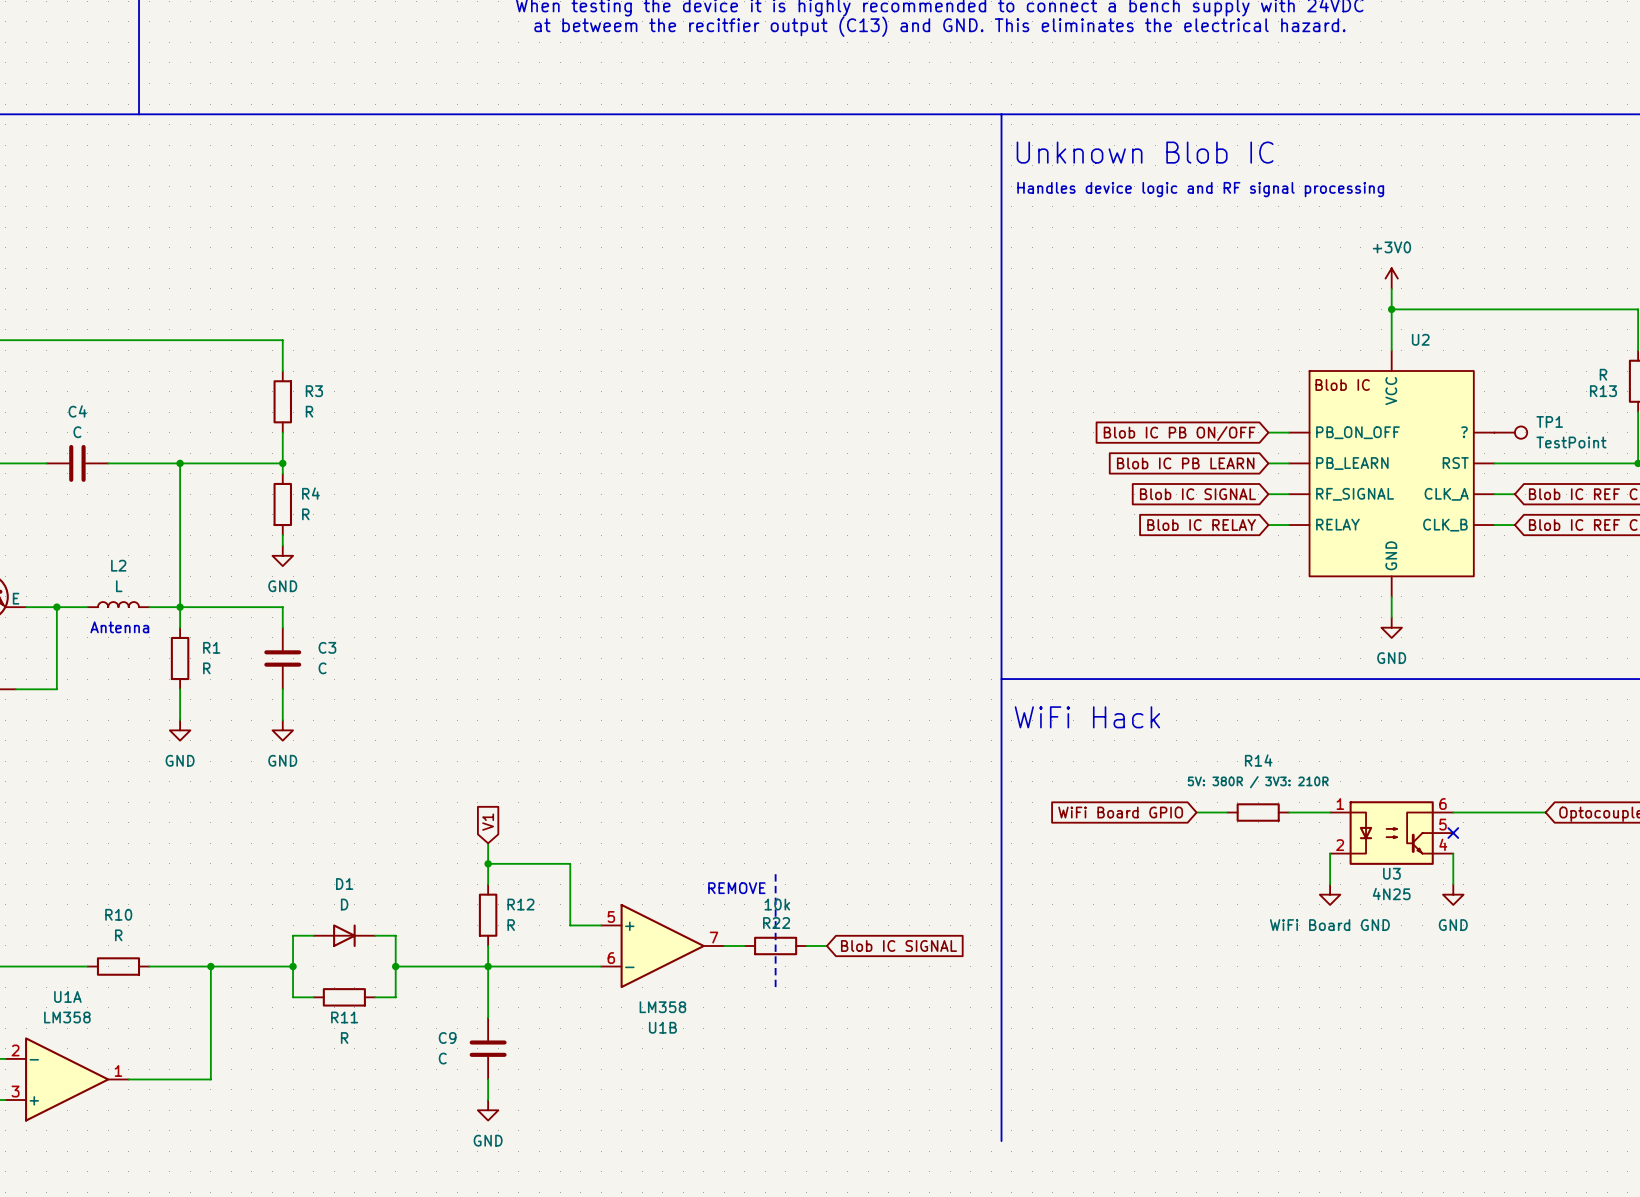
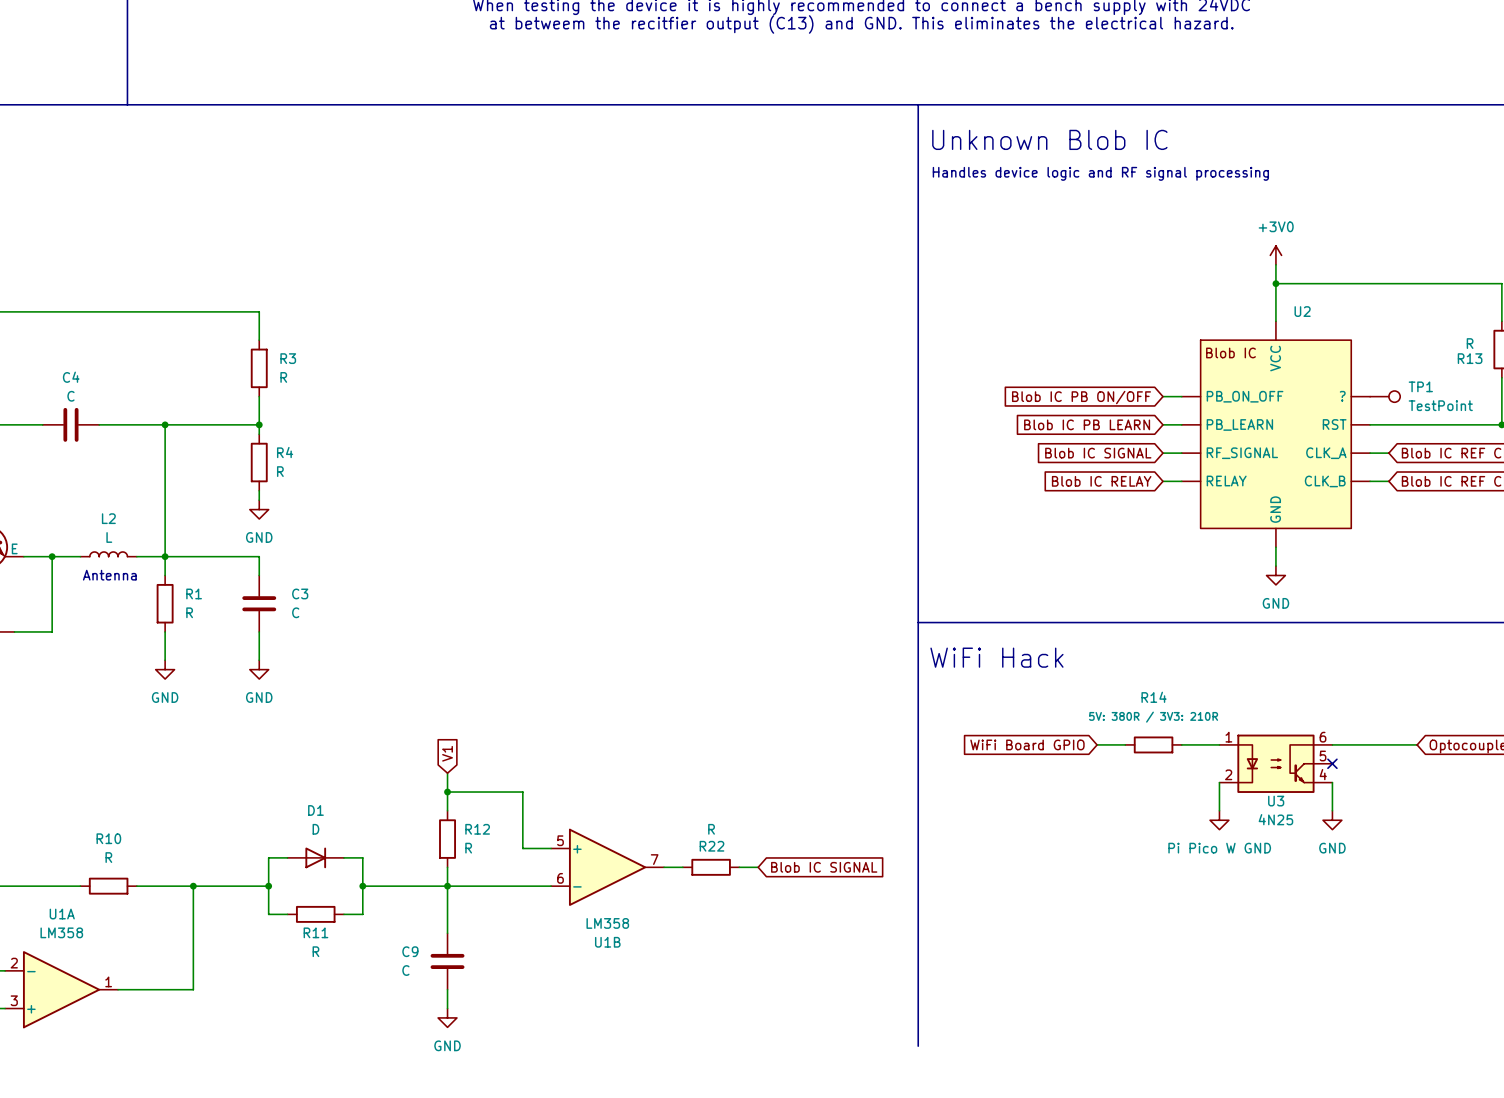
line: (775, 874) (775, 987) -> none
text: REMOVE (736, 888) -> none
power symbol: WiFi Board GND (1330, 894) -> Pi Pico W GND (1219, 820)
R22 value: 10k (777, 904) -> R (711, 829)

